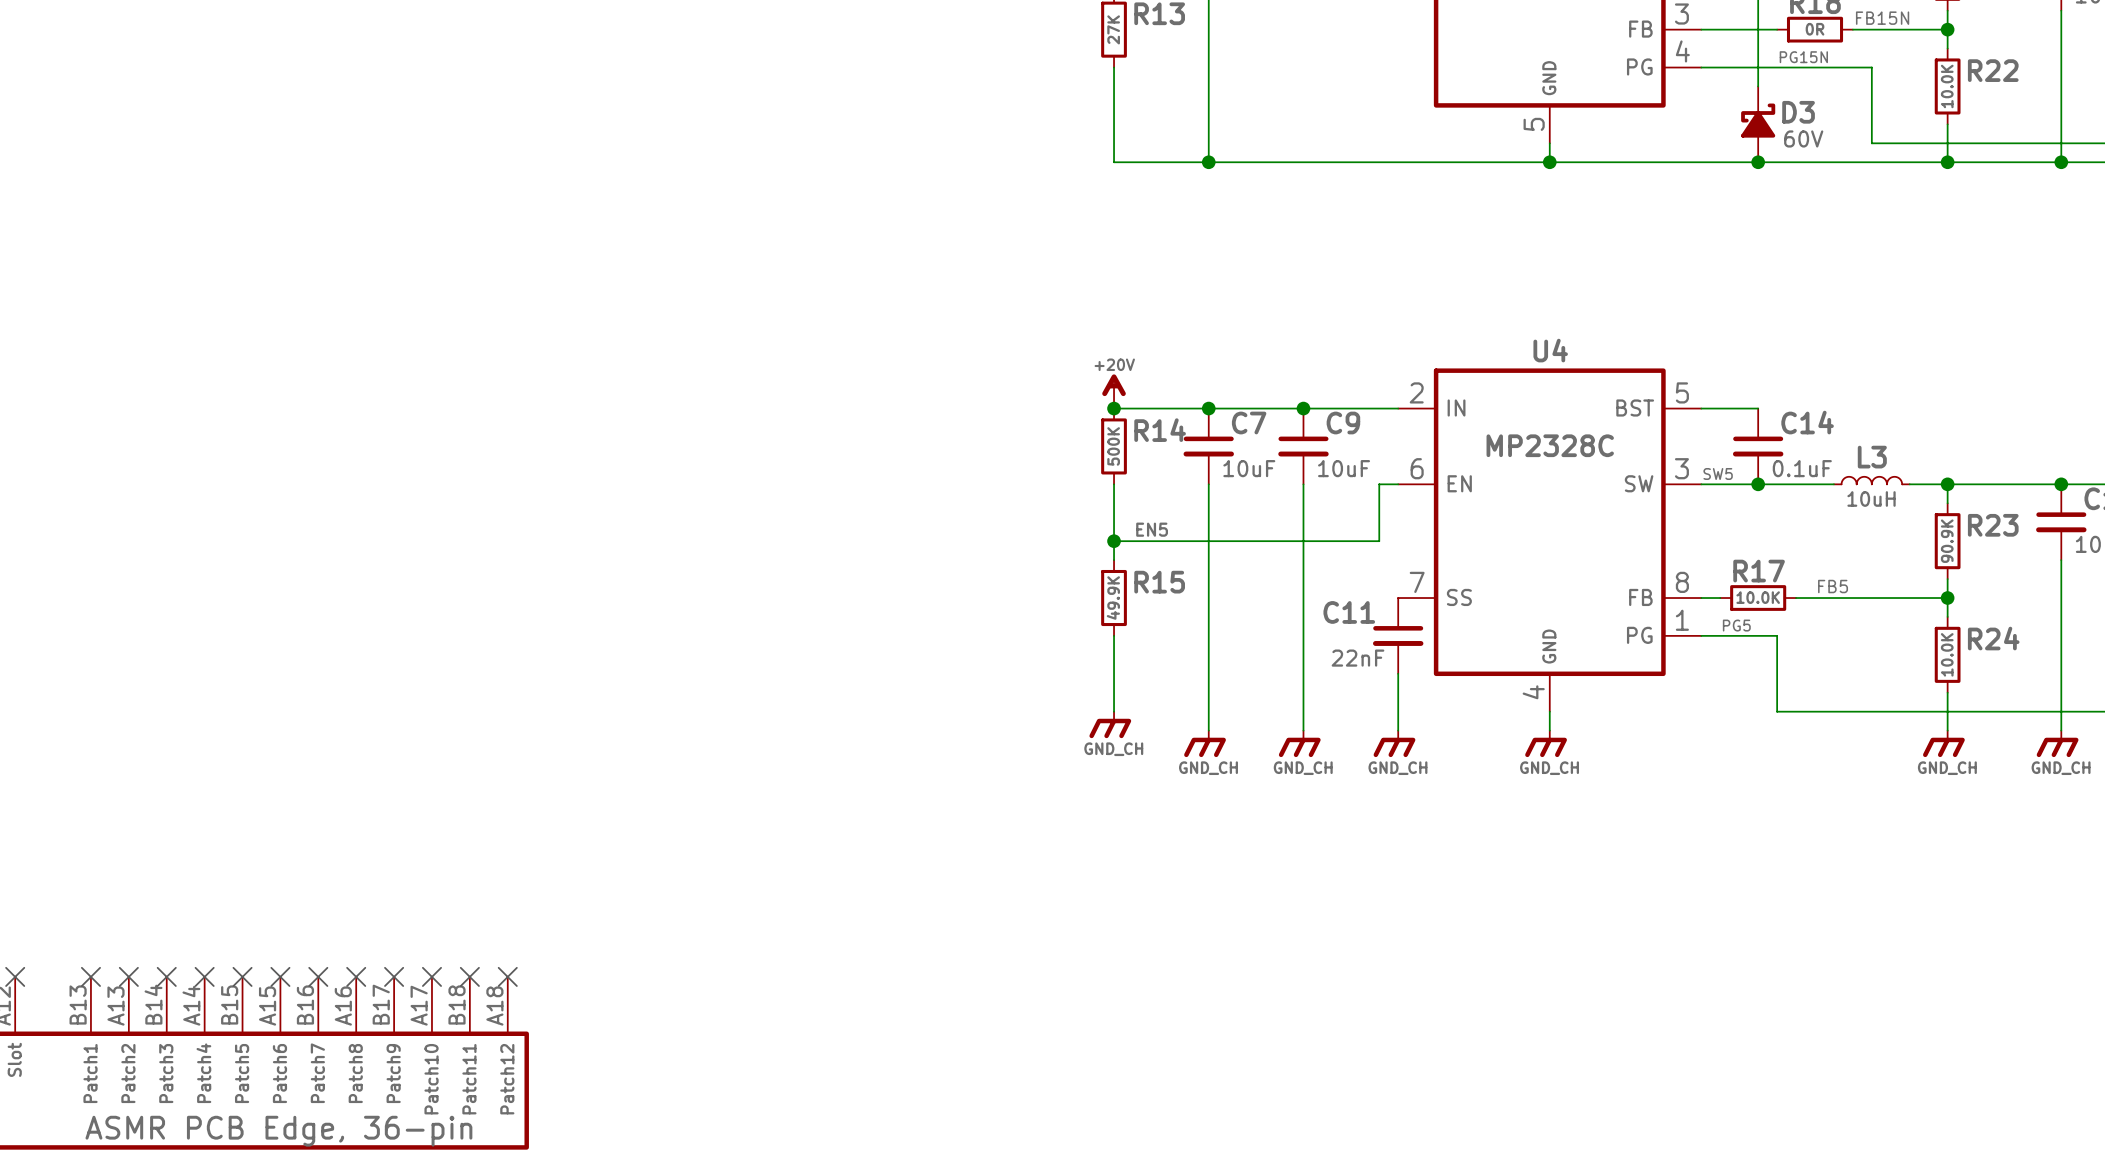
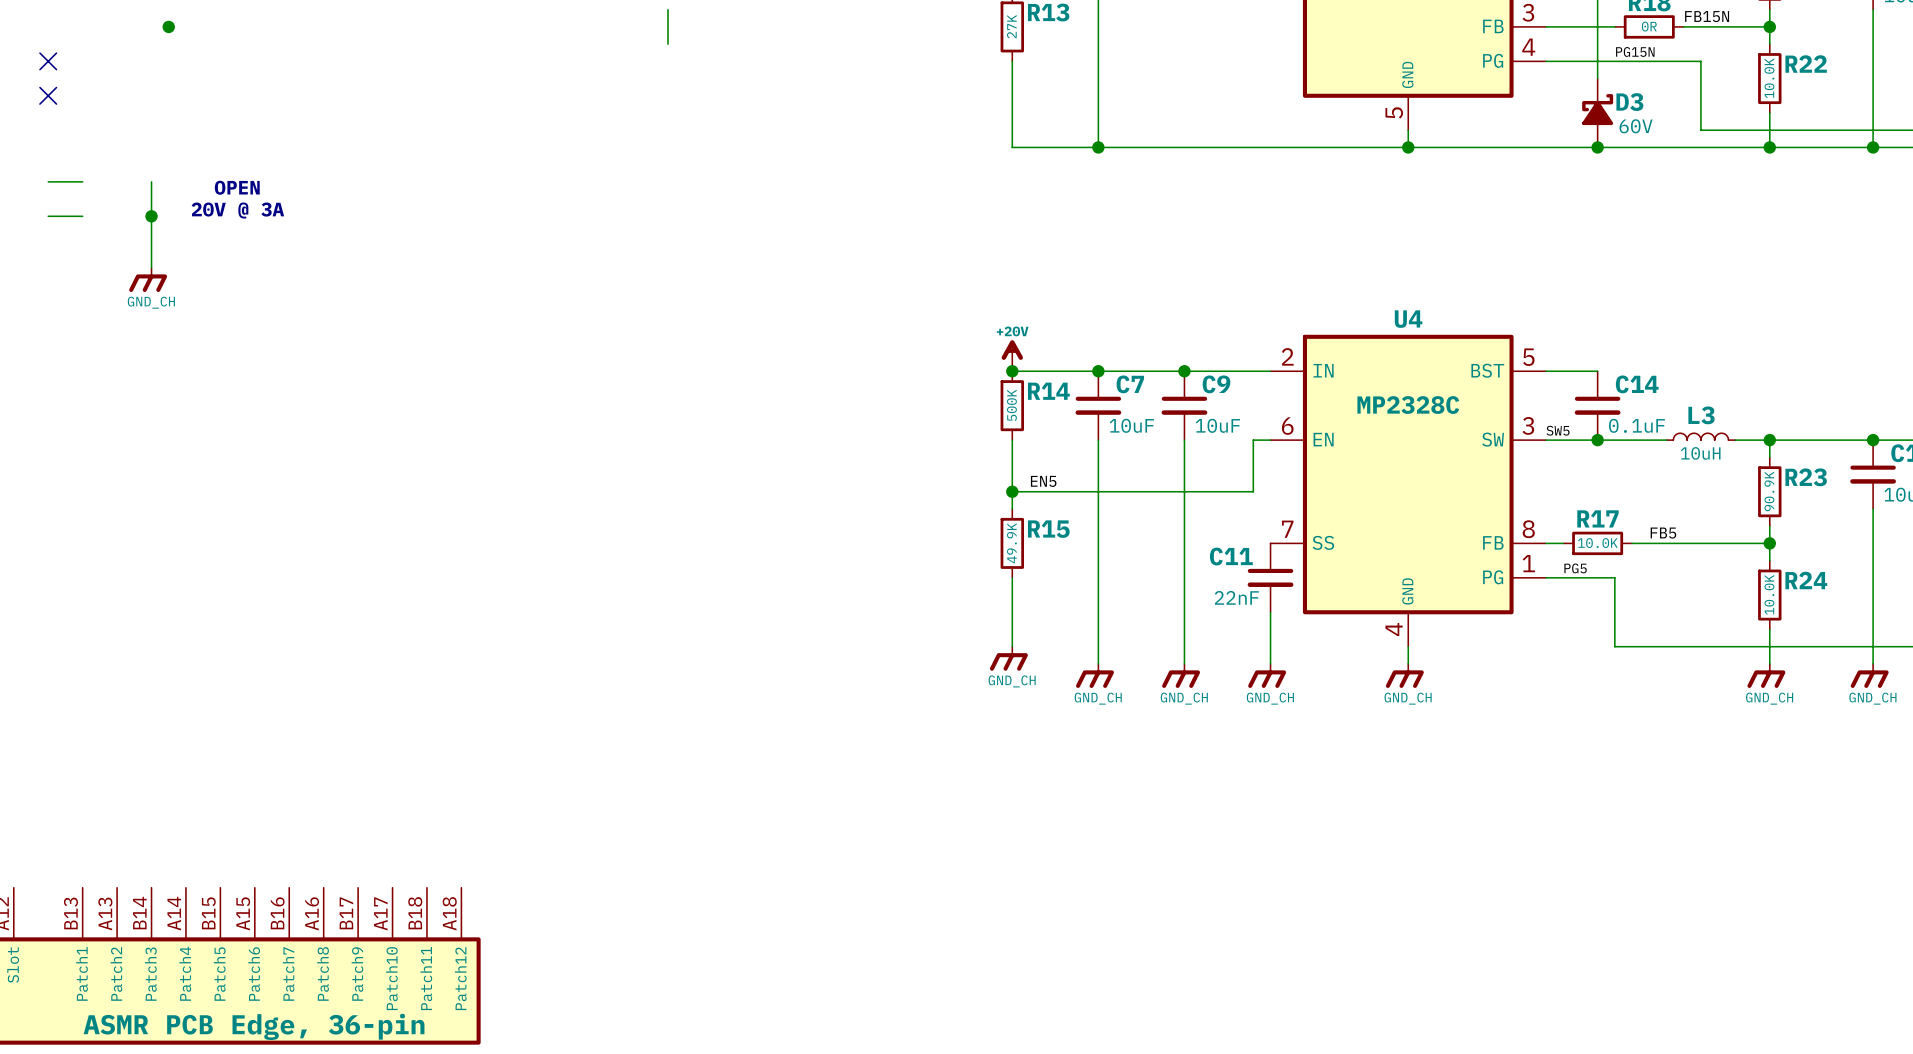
wire: none -> (667, 9) (667, 44)
junction: none -> (168, 26)
no-connect mark: none -> (48, 61)
no-connect mark: none -> (48, 95)
wire: none -> (48, 181) (82, 181)
wire: none -> (151, 181) (151, 267)
text: none -> OPEN (237, 187)
text: none -> 20V @ 3A (237, 210)
wire: none -> (48, 216) (82, 216)
junction: none -> (151, 216)
power symbol: none -> GND_CH (148, 279)
no-connect mark: (15, 976) -> none
no-connect mark: (90, 976) -> none
no-connect mark: (128, 976) -> none
no-connect mark: (166, 976) -> none
no-connect mark: (204, 976) -> none
no-connect mark: (242, 976) -> none
no-connect mark: (280, 976) -> none
no-connect mark: (318, 976) -> none
no-connect mark: (356, 976) -> none
no-connect mark: (394, 976) -> none
no-connect mark: (431, 976) -> none
no-connect mark: (469, 976) -> none
no-connect mark: (507, 976) -> none

